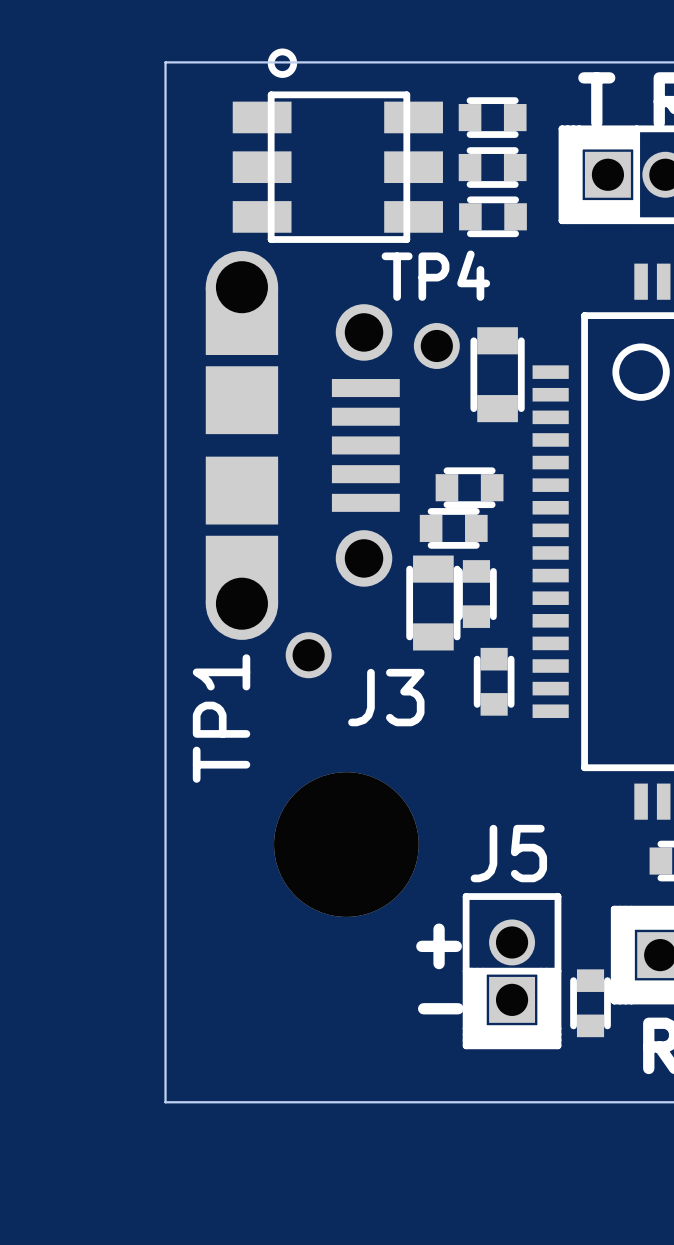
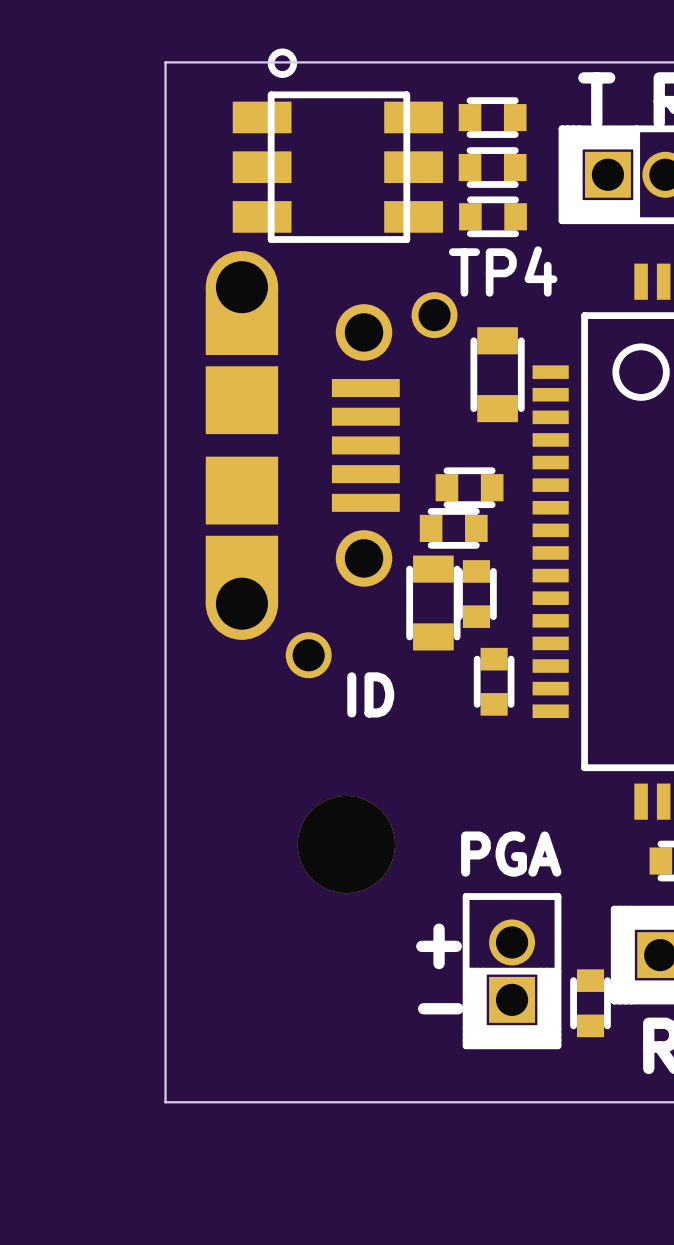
TP4 name position: TP4 (435, 275) -> TP4 (503, 271)
TP4 position: (436, 345) -> (434, 315)
text: none -> ID (370, 694)
J3 name: J3 (386, 697) -> none
TP1 name: TP1 (221, 718) -> none
part footprint: [274, 772, 419, 917] -> [297, 795, 395, 894]
J5 name: J5 (508, 853) -> none
text: none -> PGA (511, 854)

